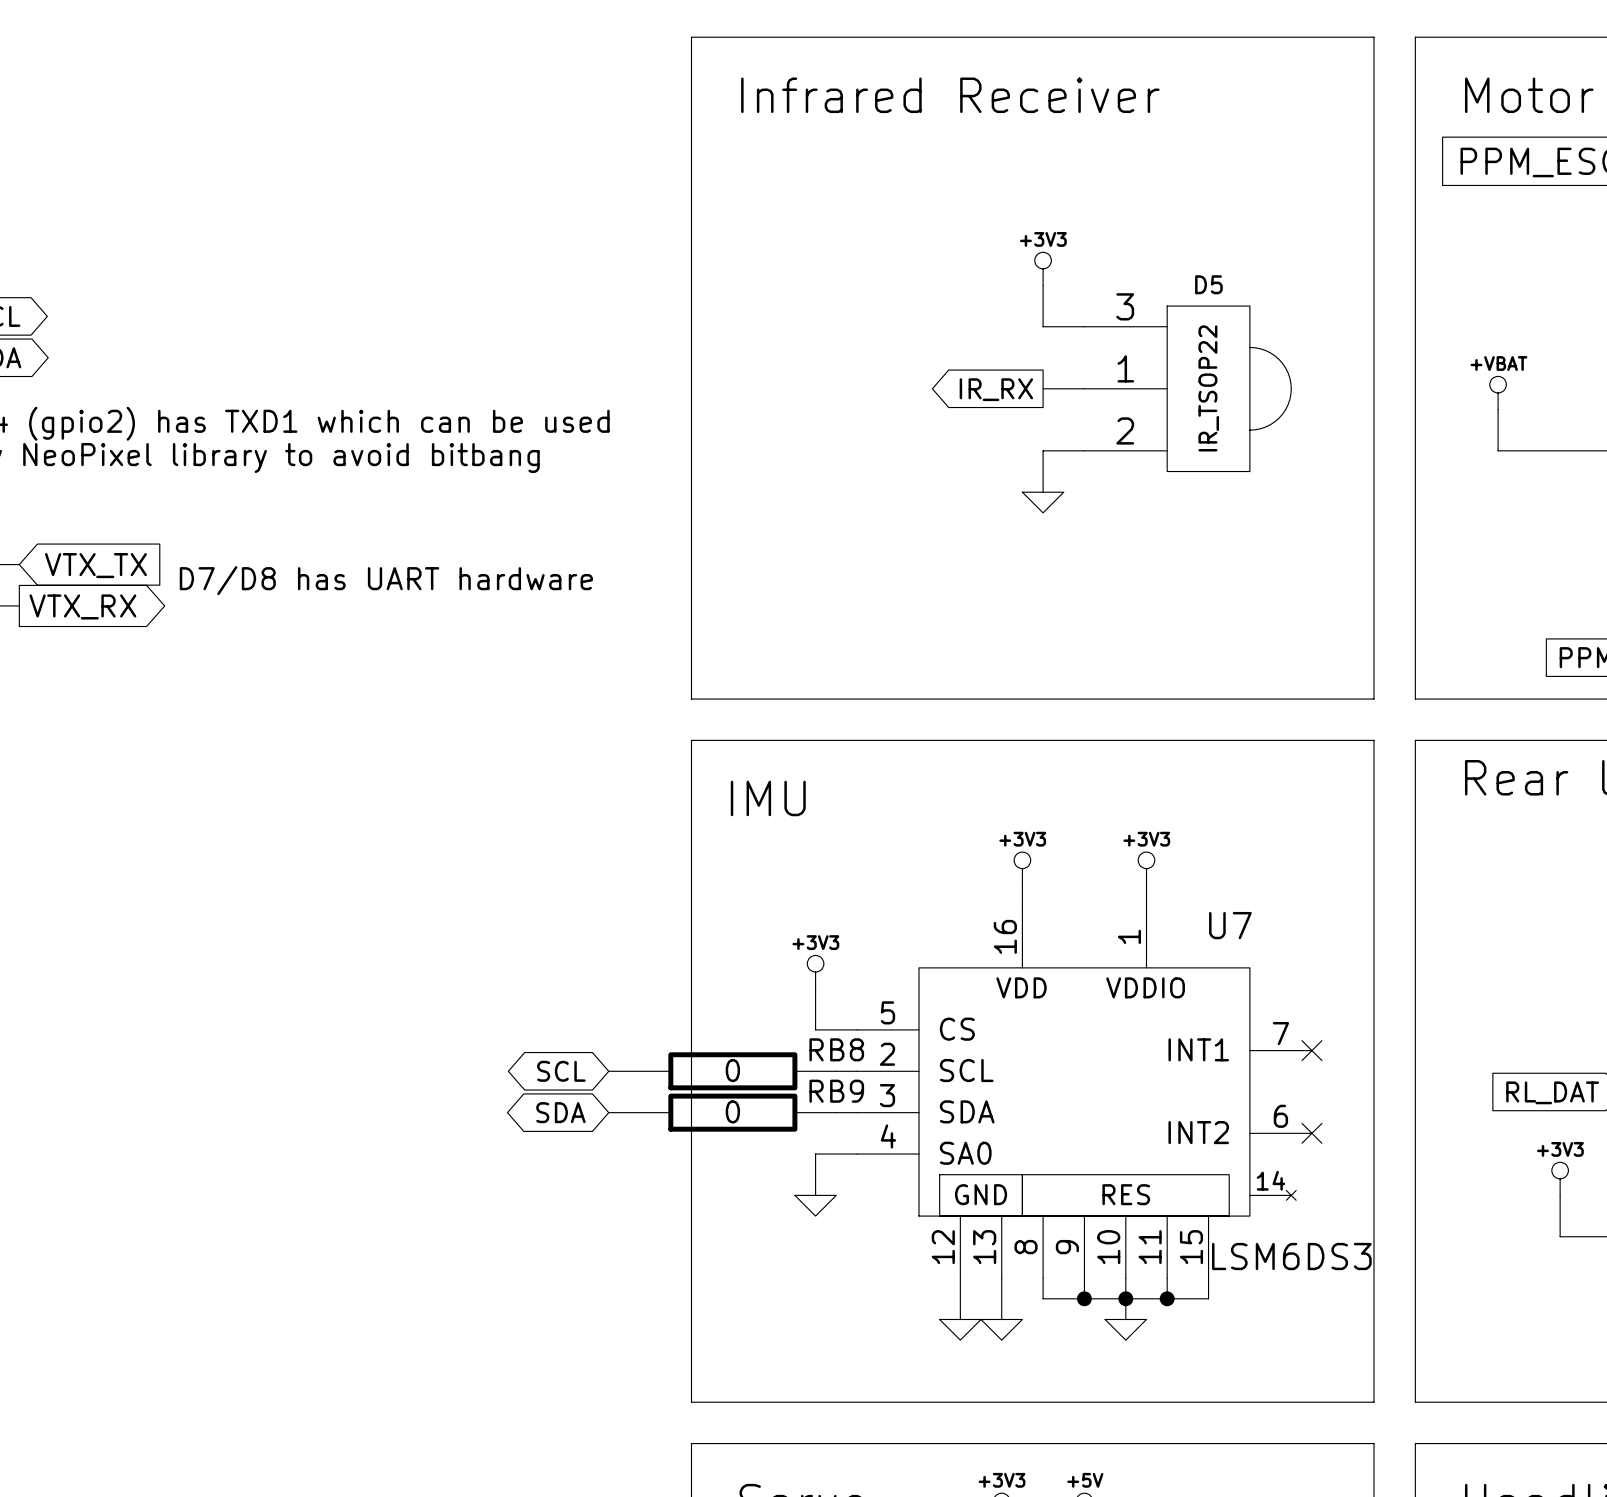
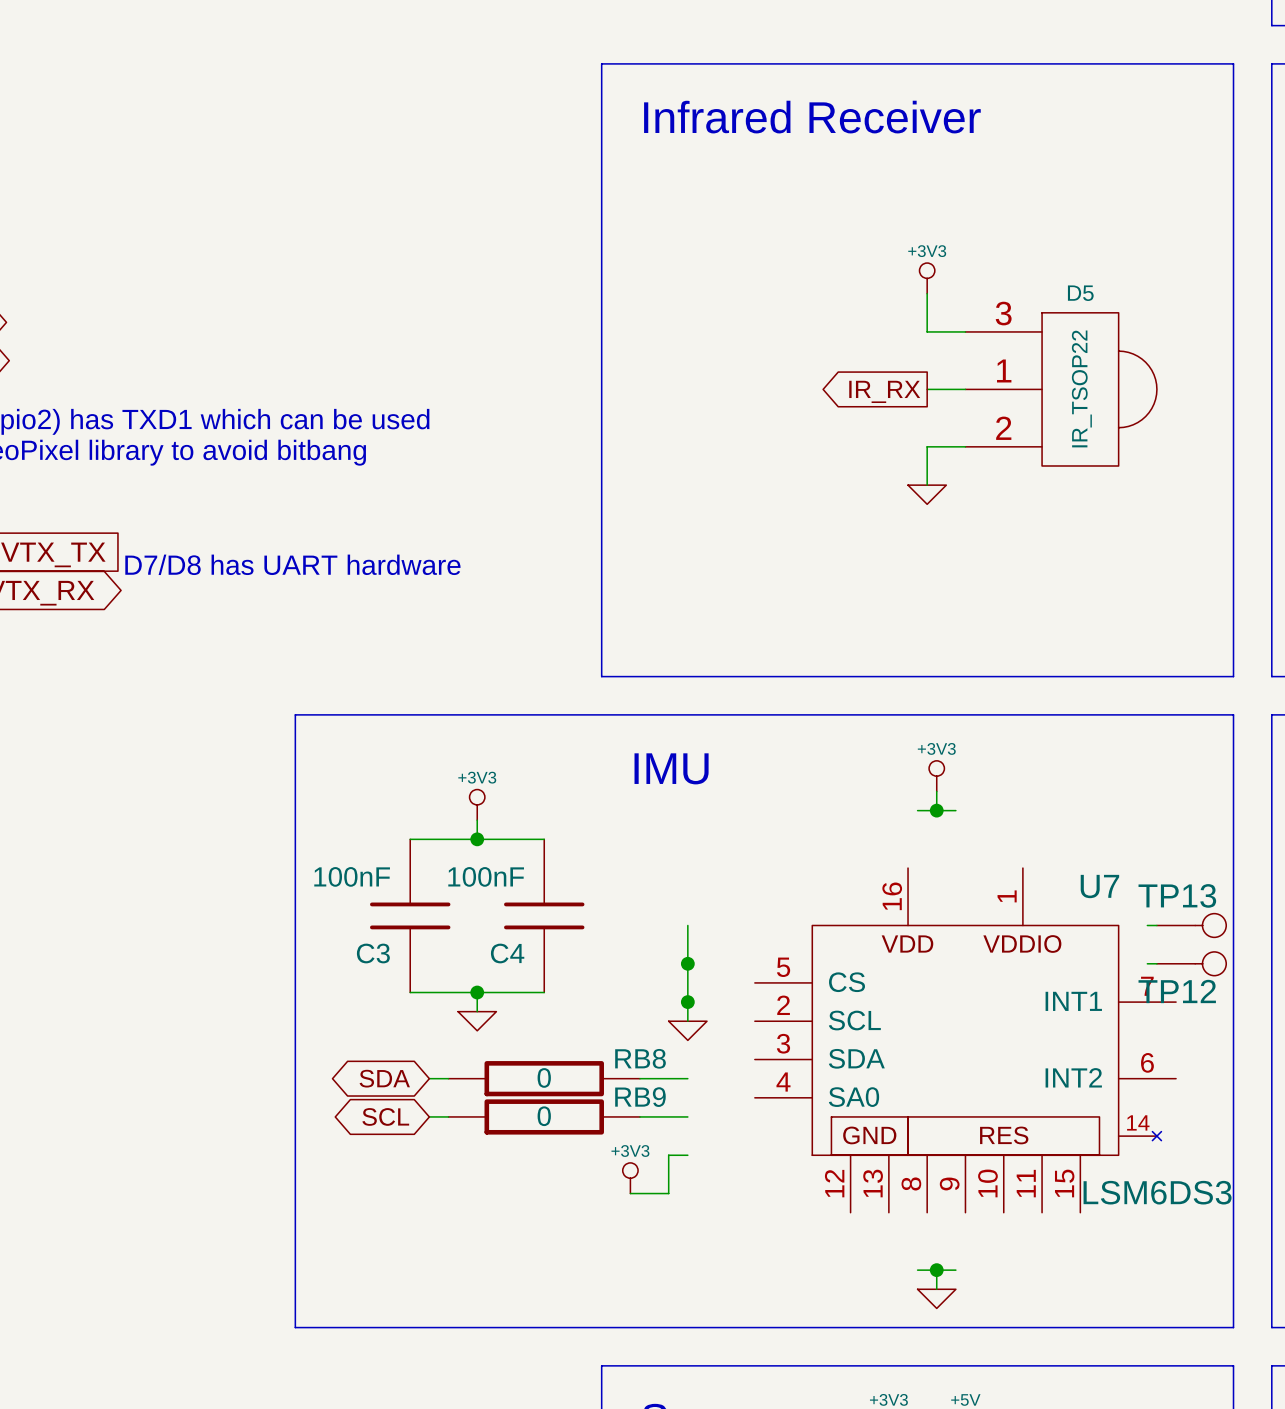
line: (691, 740) (691, 1402) -> (601, 714) (295, 714) (295, 1327) (601, 1327)
power symbol: none -> +3V3 (936, 776)
power symbol: none -> +3V3 (477, 804)
wire: none -> (917, 810) (955, 810)
junction: none -> (936, 810)
wire: none -> (477, 820) (477, 839)
power symbol: +3V3 (1022, 868) -> none
power symbol: +3V3 (1146, 868) -> none
wire: none -> (410, 839) (544, 839)
junction: none -> (477, 839)
wire: (1022, 885) (1022, 905) -> (936, 791) (936, 810)
wire: (1146, 885) (1146, 905) -> none
C3: none -> 100nF (410, 915)
C4: none -> 100nF (544, 915)
wire: none -> (687, 925) (687, 1021)
wire: none -> (1147, 925) (1156, 925)
TP13: none -> (1191, 925)
power symbol: +3V3 (815, 972) -> none
wire: (815, 988) (815, 1029) (856, 1029) -> none
junction: none -> (687, 963)
wire: none -> (1147, 963) (1156, 963)
TP12: none -> (1191, 963)
wire: none -> (410, 992) (544, 992)
wire: none -> (477, 992) (477, 1011)
junction: none -> (477, 992)
junction: none -> (687, 1002)
no-connect mark: (1311, 1050) -> none
power symbol: none -> (477, 1021)
global label position: SCL (561, 1071) -> SCL (385, 1116)
wire: (608, 1071) (629, 1071) -> (429, 1078) (448, 1078)
RB8 position: (732, 1071) -> (544, 1078)
wire: (836, 1071) (856, 1071) -> none
global label position: SDA (560, 1112) -> SDA (384, 1078)
wire: (608, 1112) (629, 1112) -> (429, 1116) (448, 1116)
RB9 position: (732, 1112) -> (544, 1116)
wire: (836, 1112) (856, 1112) -> none
wire: none -> (639, 1078) (687, 1078)
no-connect mark: (1311, 1133) -> none
wire: (856, 1154) (815, 1154) (815, 1195) -> none
wire: none -> (639, 1116) (687, 1116)
power symbol position: (815, 1205) -> (687, 1030)
wire: none -> (687, 1155) (668, 1155) (668, 1193) (630, 1193)
power symbol: none -> +3V3 (630, 1178)
wire: (960, 1278) (960, 1319) -> none
wire: (1001, 1278) (1001, 1319) -> none
wire: (1043, 1278) (1043, 1298) (1208, 1298) (1208, 1278) -> none
wire: (1084, 1278) (1084, 1298) -> (936, 1270) (936, 1289)
wire: (1125, 1278) (1125, 1319) -> none
wire: (1167, 1278) (1167, 1298) -> none
junction: (1084, 1298) -> none
junction: (1125, 1298) -> none
junction: (1167, 1298) -> none
power symbol: (960, 1329) -> none
power symbol: (1001, 1329) -> none
power symbol: (1125, 1329) -> none
wire: none -> (917, 1270) (955, 1270)
junction: none -> (936, 1270)
power symbol: none -> (936, 1298)

